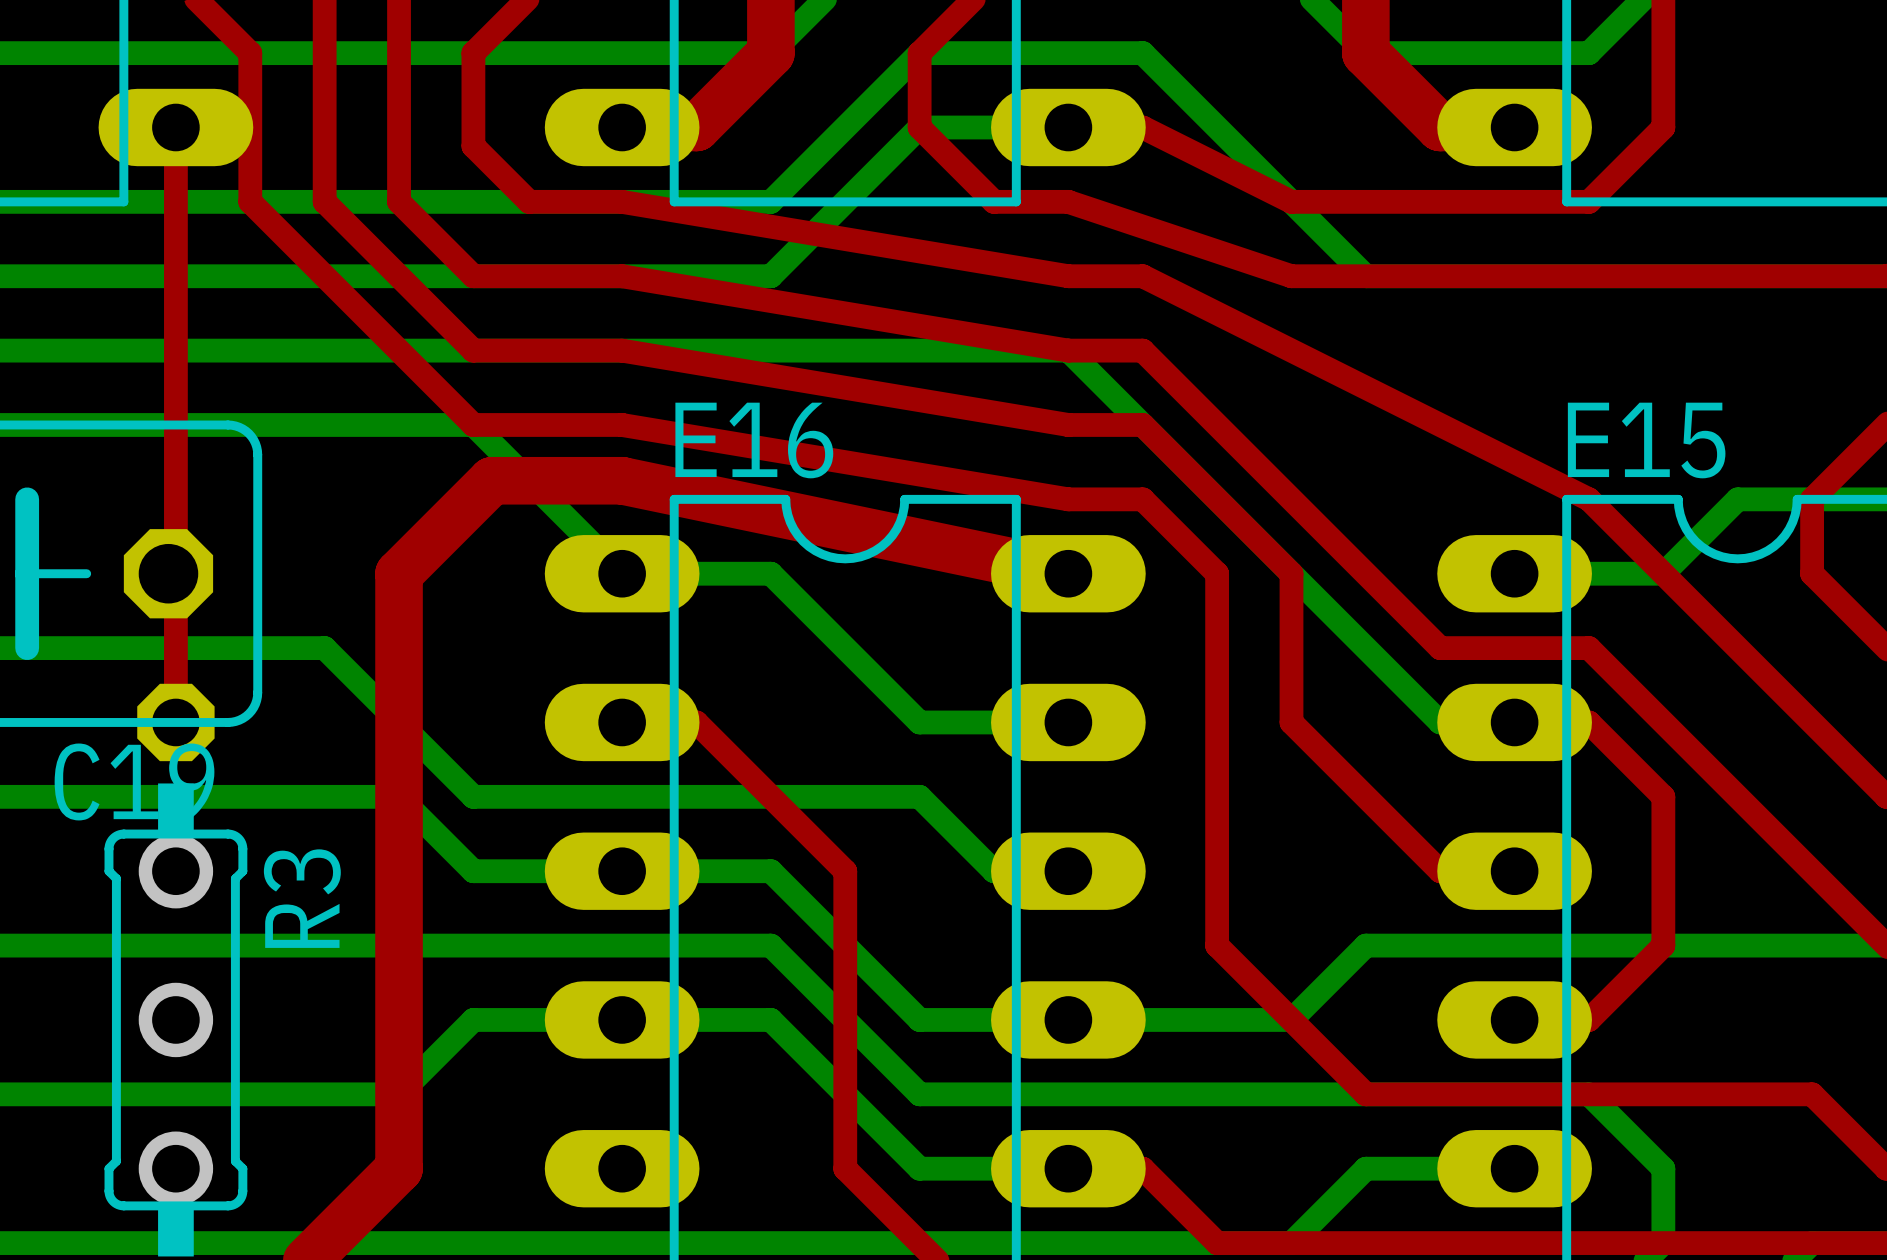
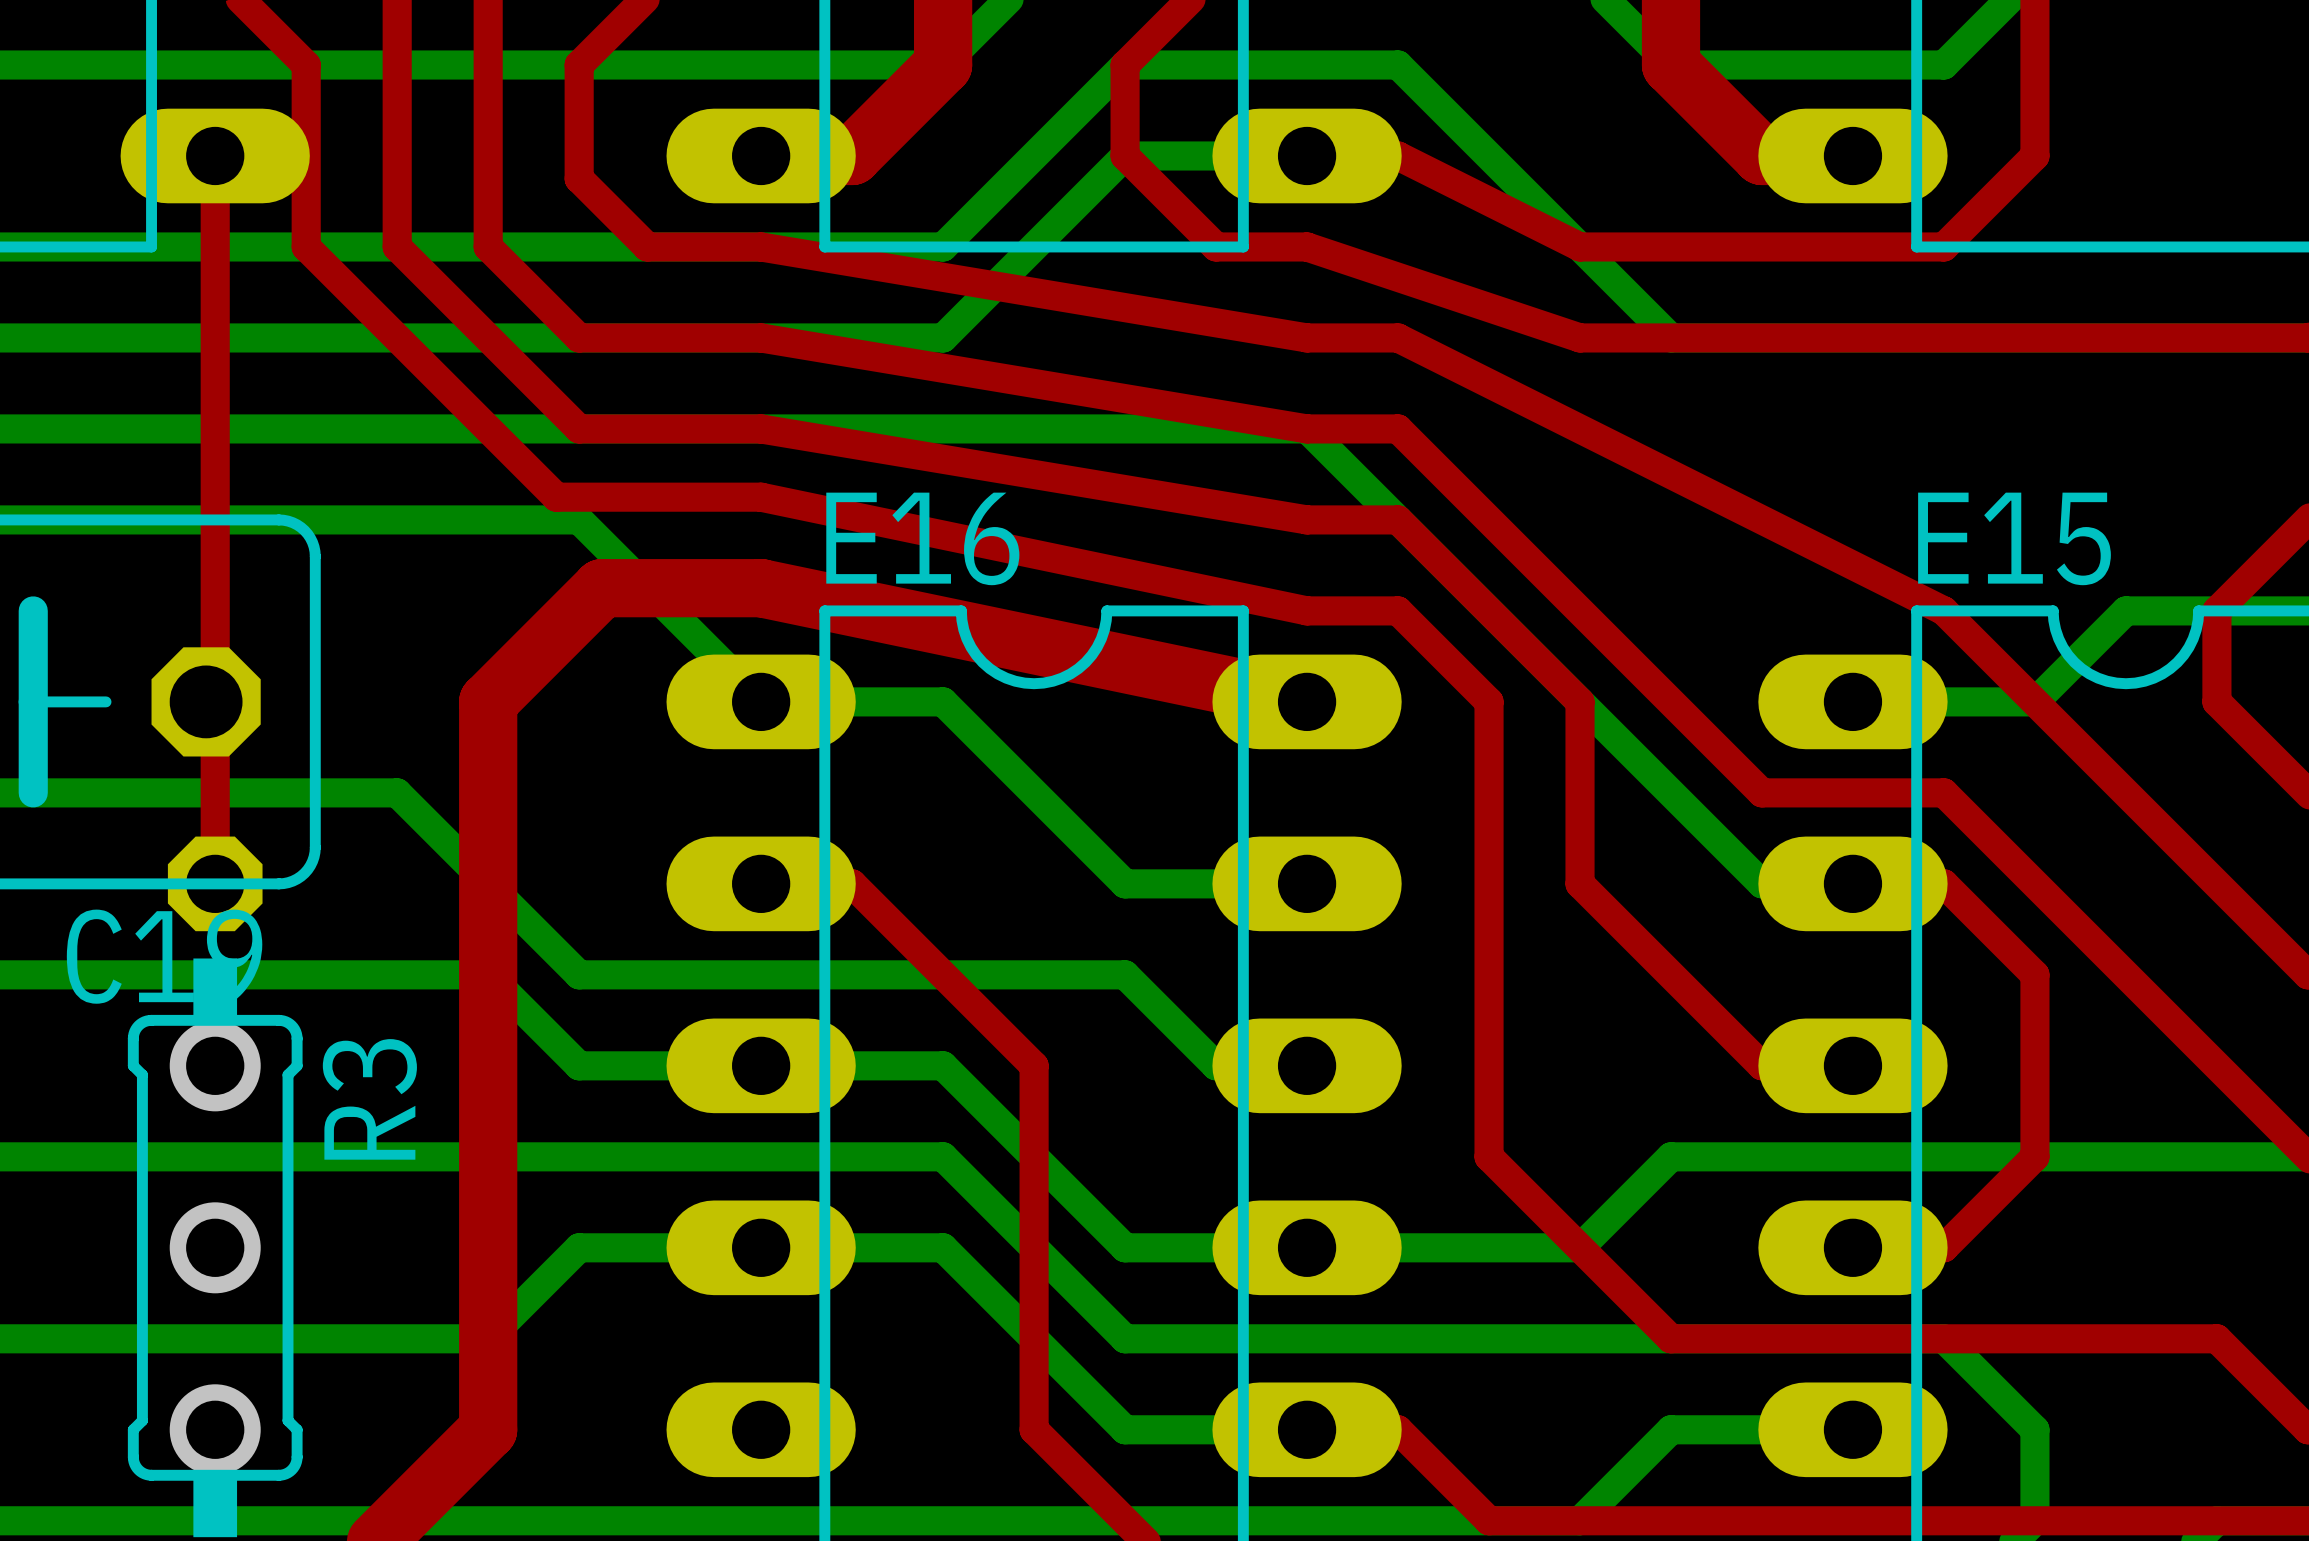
top track: (454, 406) (473, 424) (622, 424) (1068, 499) -> (556, 497) (761, 497) (1307, 610)

